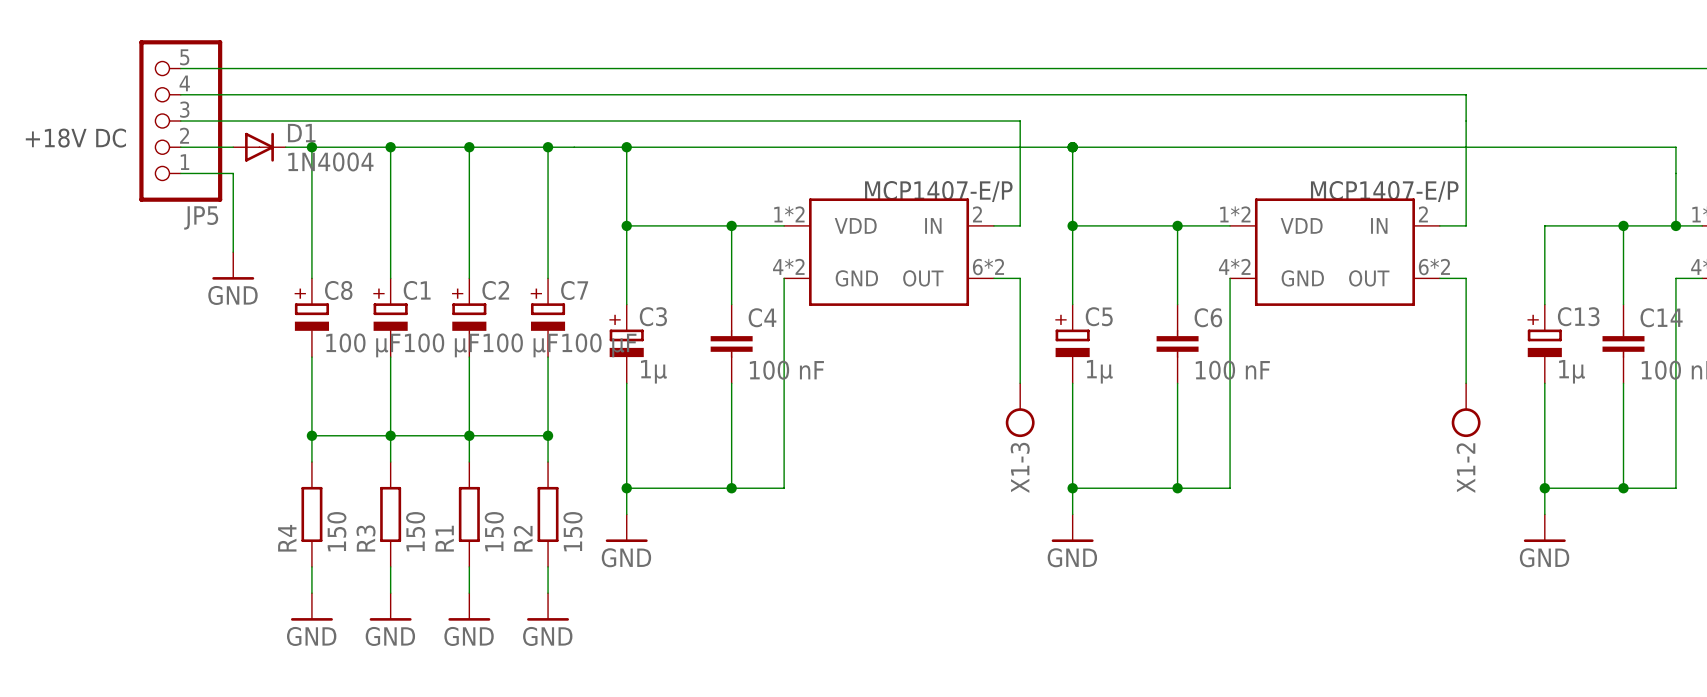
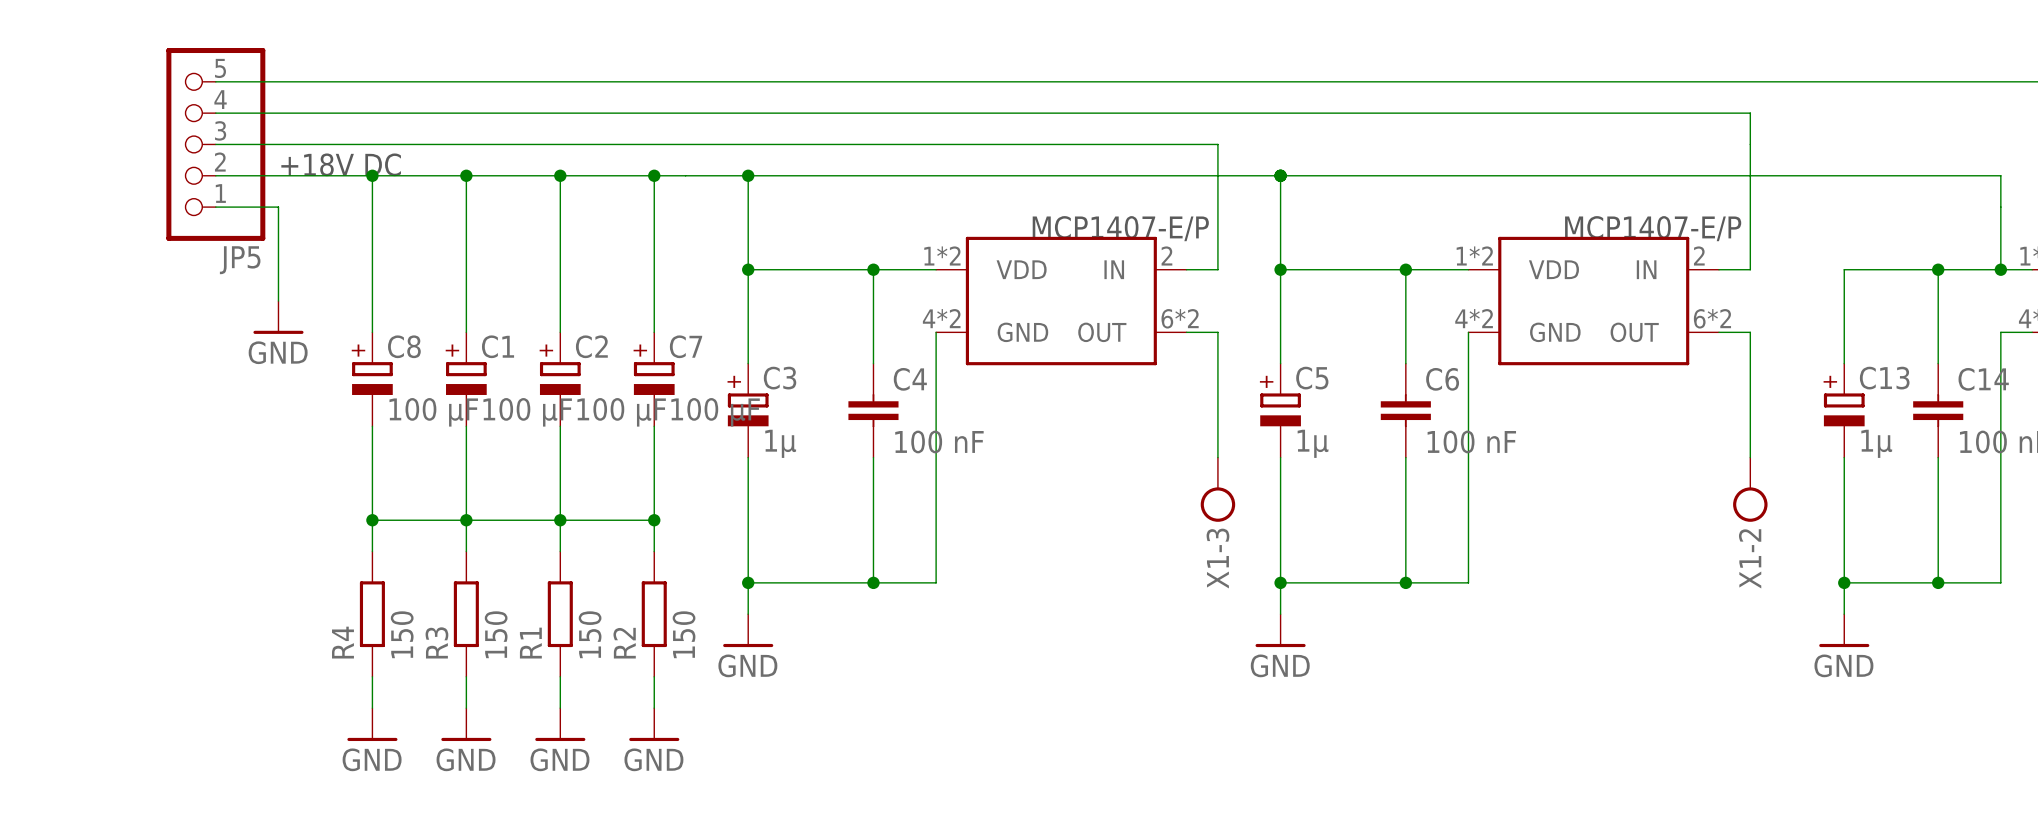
text position: +18V DC (75, 138) -> +18V DC (341, 164)
D1: 1N4004 (259, 147) -> none

